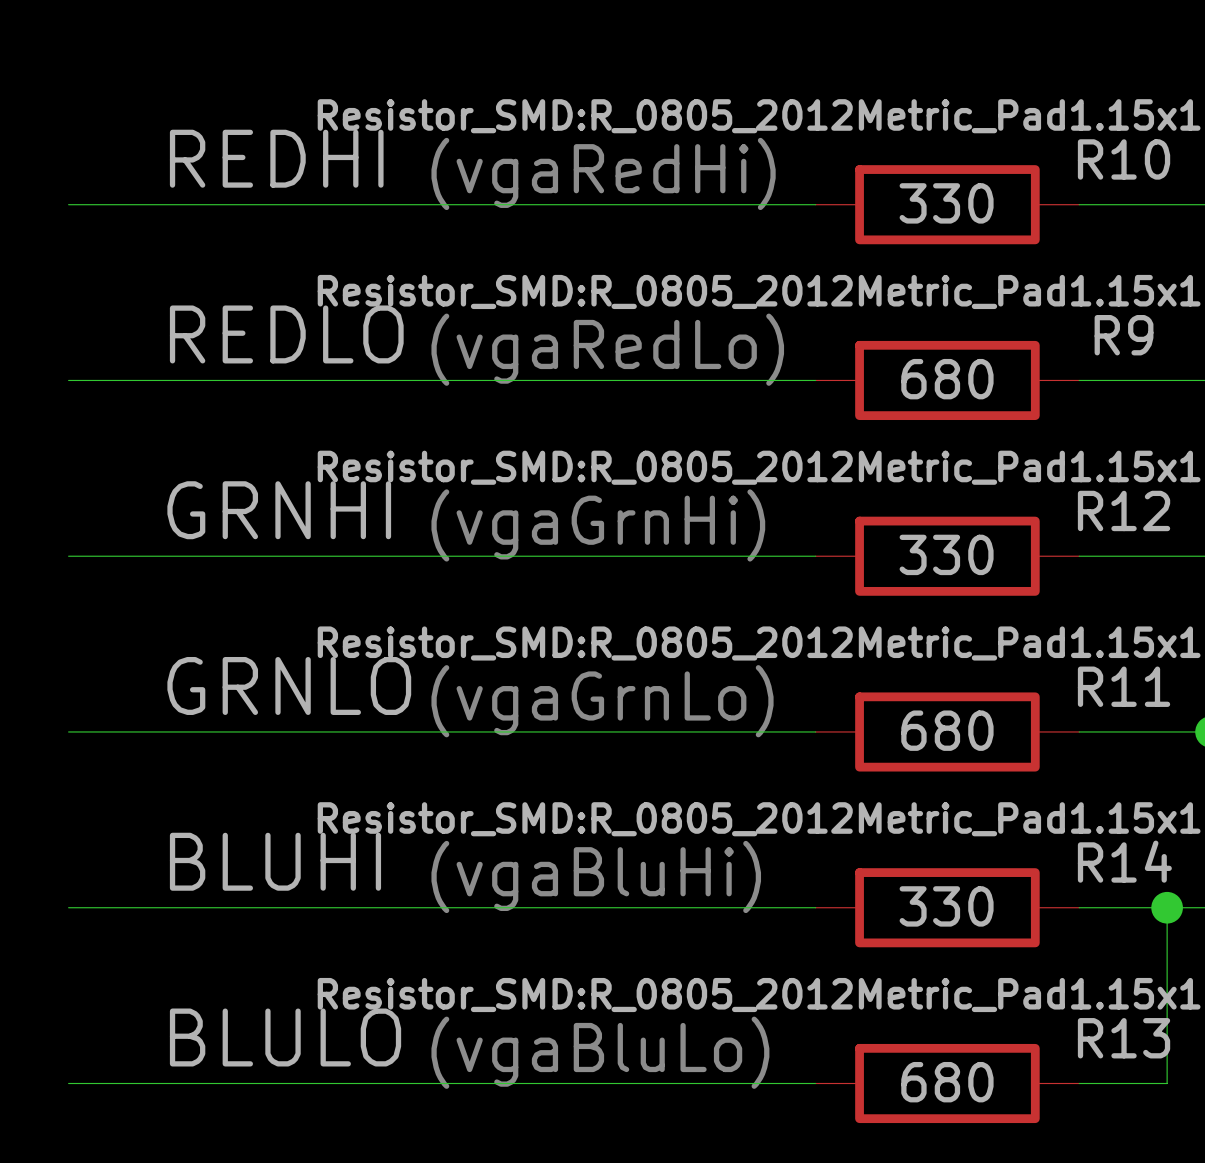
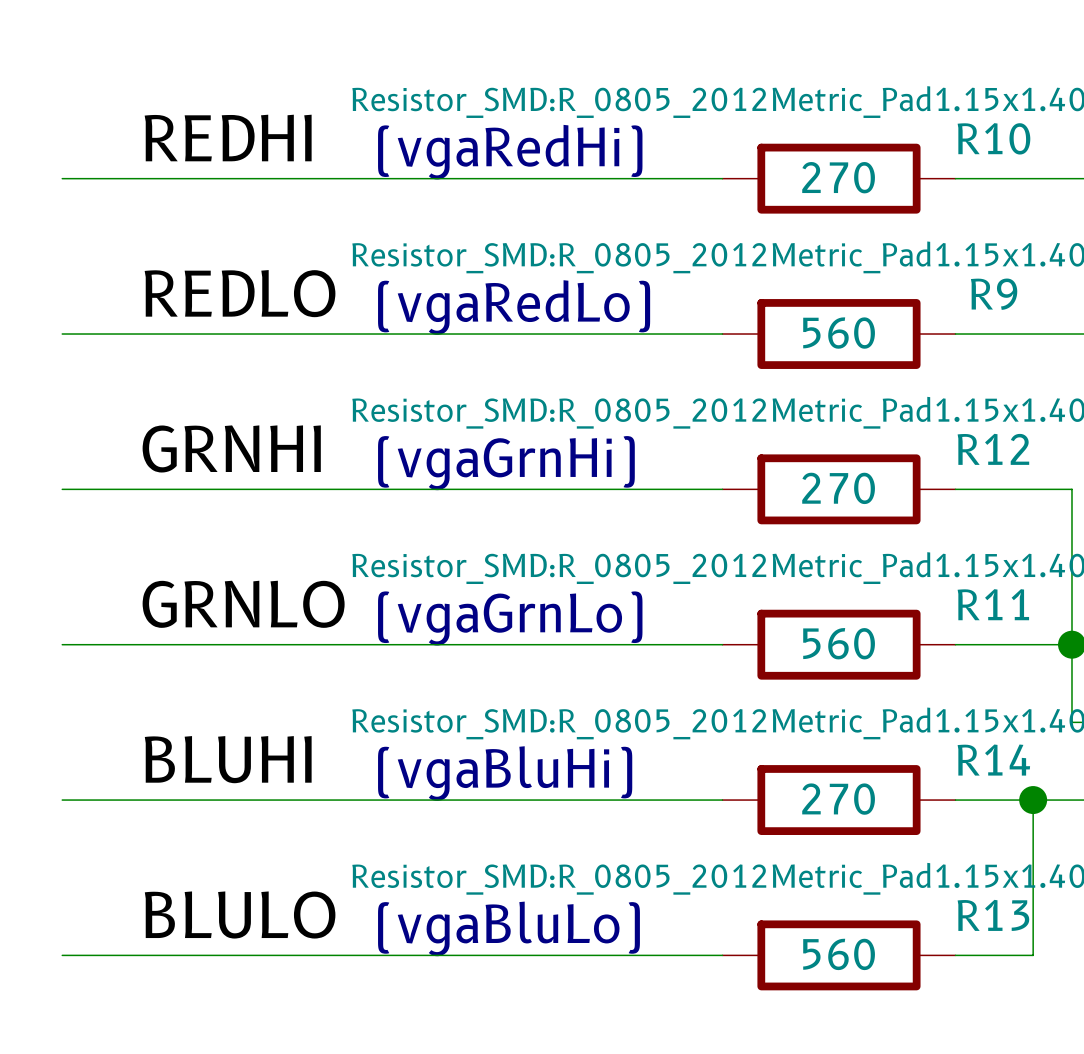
R10 value: 330 (946, 203) -> 270 (838, 177)
R9 value: 680 (947, 379) -> 560 (839, 333)
R12 value: 330 (946, 554) -> 270 (838, 488)
R11 value: 680 (947, 730) -> 560 (839, 643)
R14 value: 330 (946, 906) -> 270 (838, 799)
R13 value: 680 (947, 1082) -> 560 (839, 954)

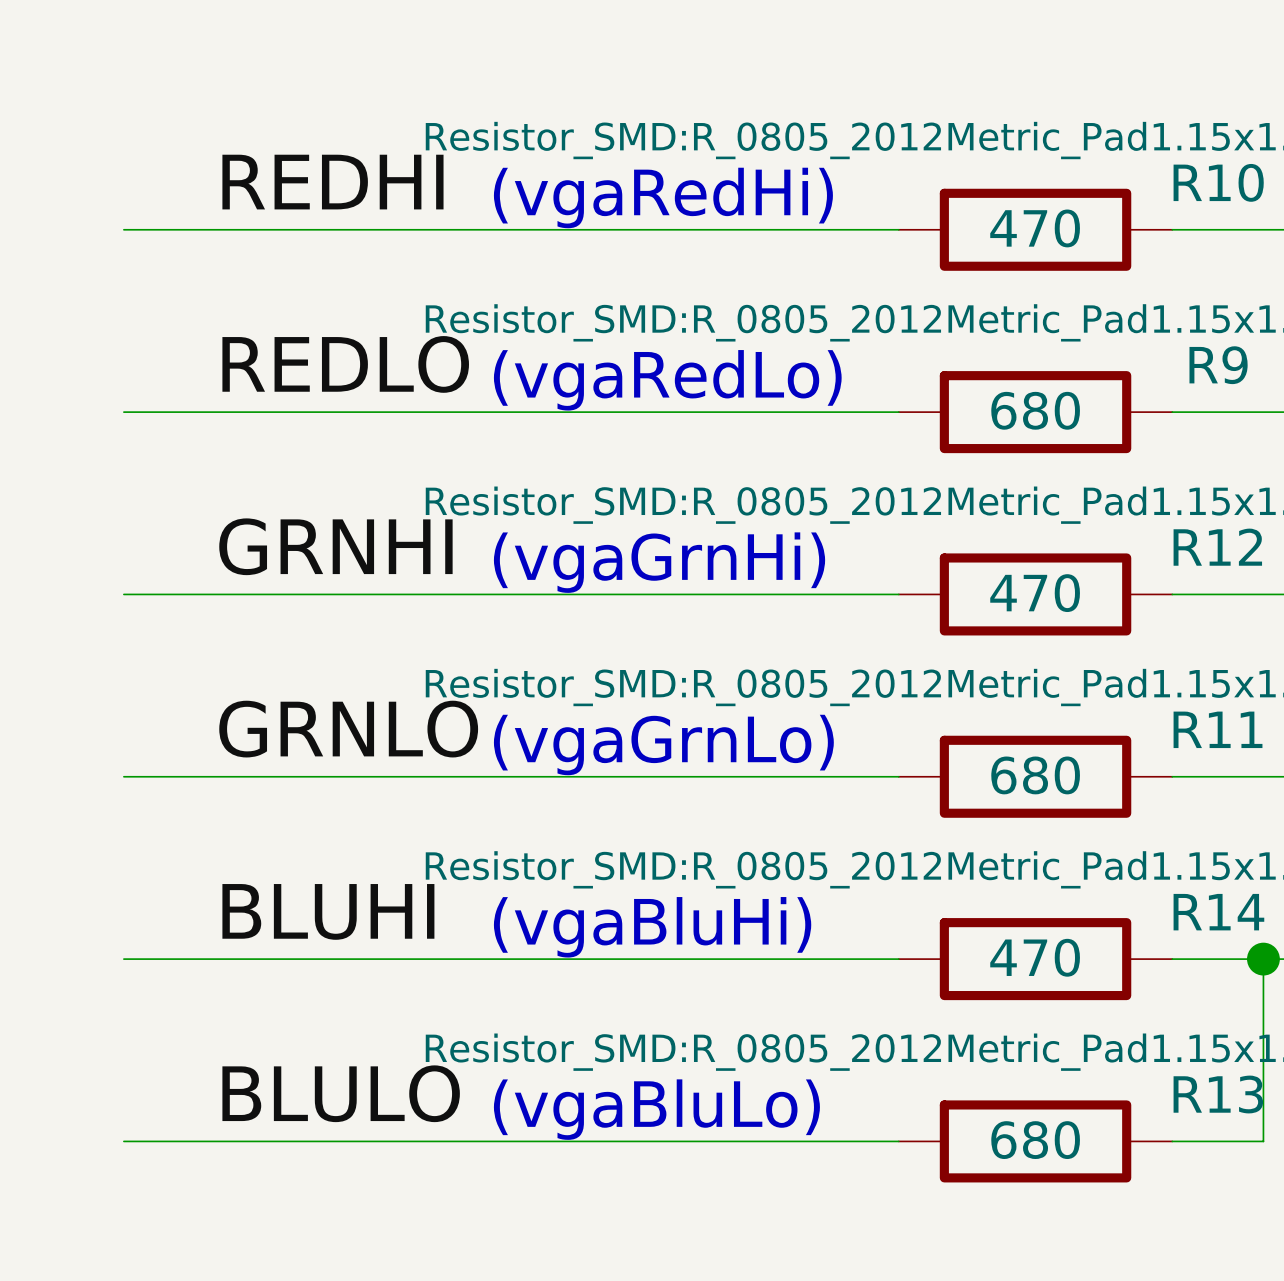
R10 value: 270 (838, 177) -> 470 (1035, 228)
R9 value: 560 (839, 333) -> 680 (1035, 410)
R12 value: 270 (838, 488) -> 470 (1035, 593)
R11 value: 560 (839, 643) -> 680 (1035, 775)
R14 value: 270 (838, 799) -> 470 (1035, 957)
R13 value: 560 (839, 954) -> 680 (1035, 1140)

